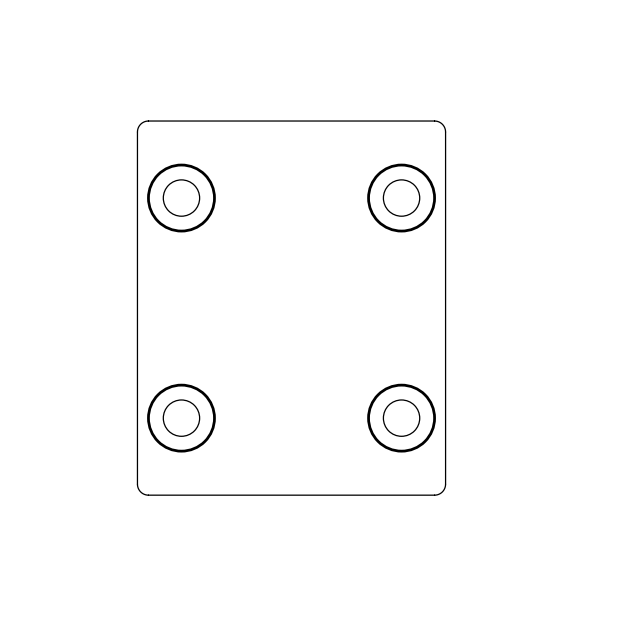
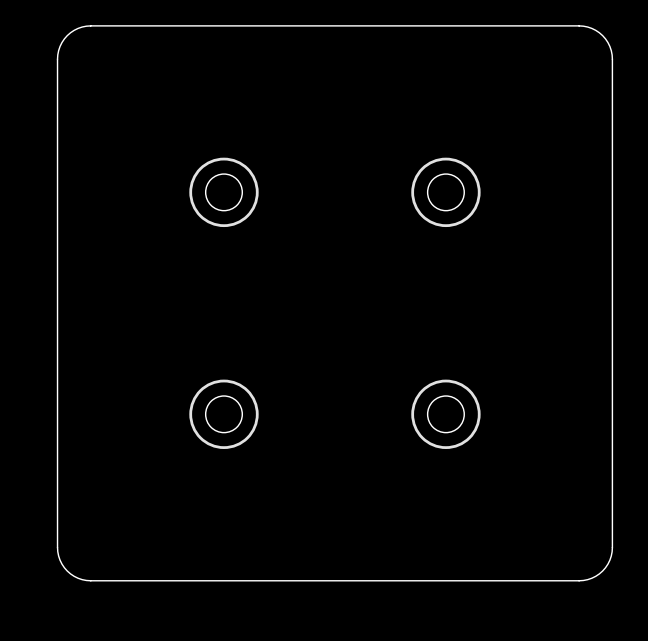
board edge: none -> (579, 25) (90, 25) (78, 28) (67, 35) (60, 46) (57, 59) (57, 547) (60, 560) (67, 571) (78, 578) (90, 580) (579, 580) (591, 578) (602, 571) (609, 560) (612, 547) (612, 59) (609, 46) (602, 35) (591, 28) (579, 25)
board edge: (434, 121) (148, 121) (139, 125) (137, 132) (137, 484) (141, 492) (148, 495) (434, 495) (443, 490) (445, 484) (445, 132) (442, 124) (434, 121) -> none

